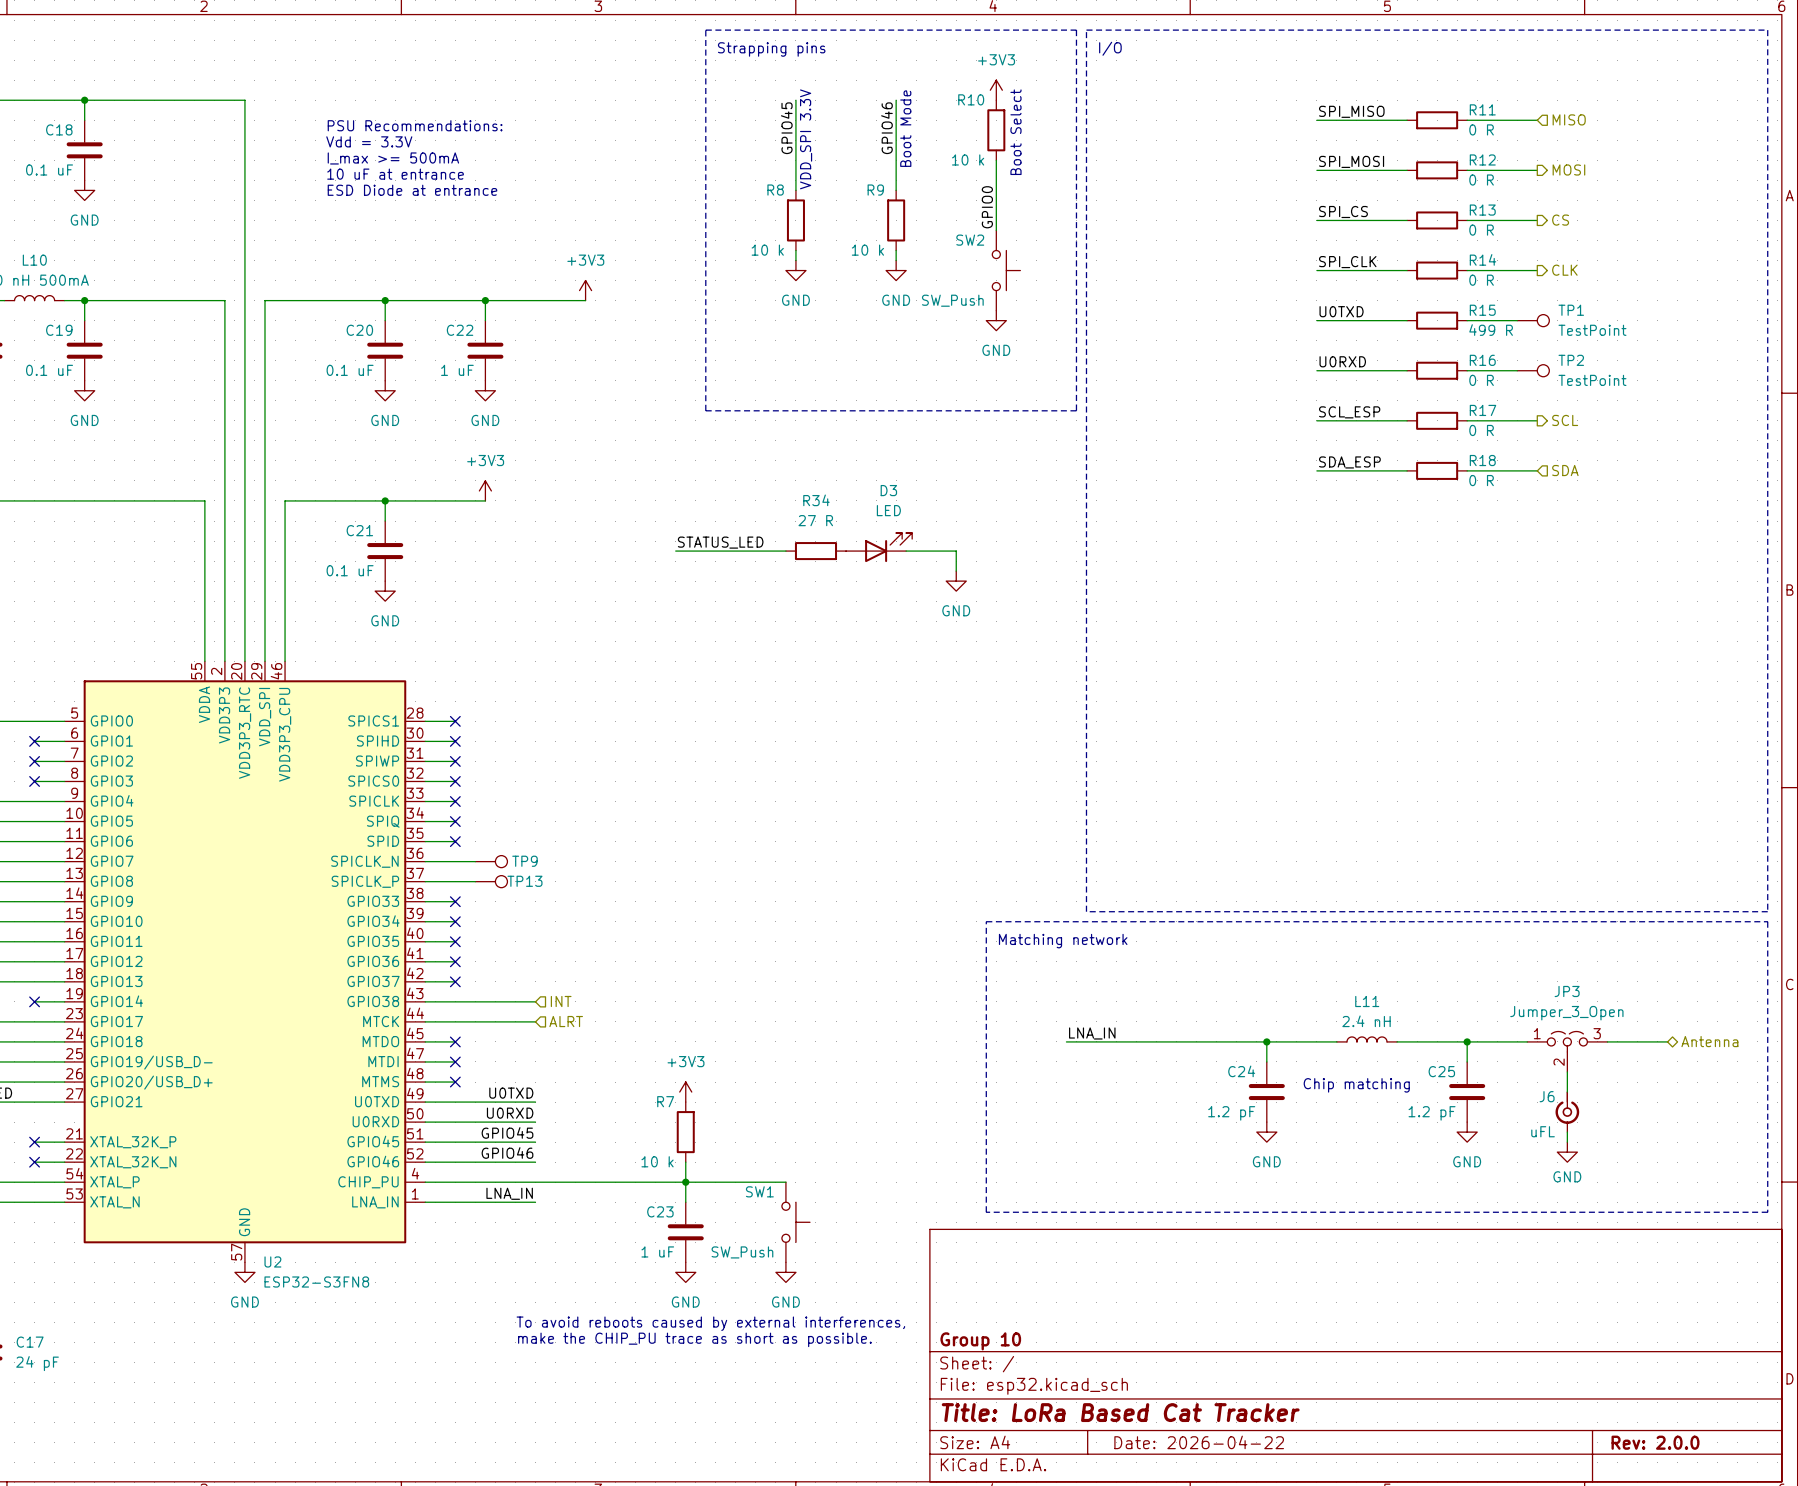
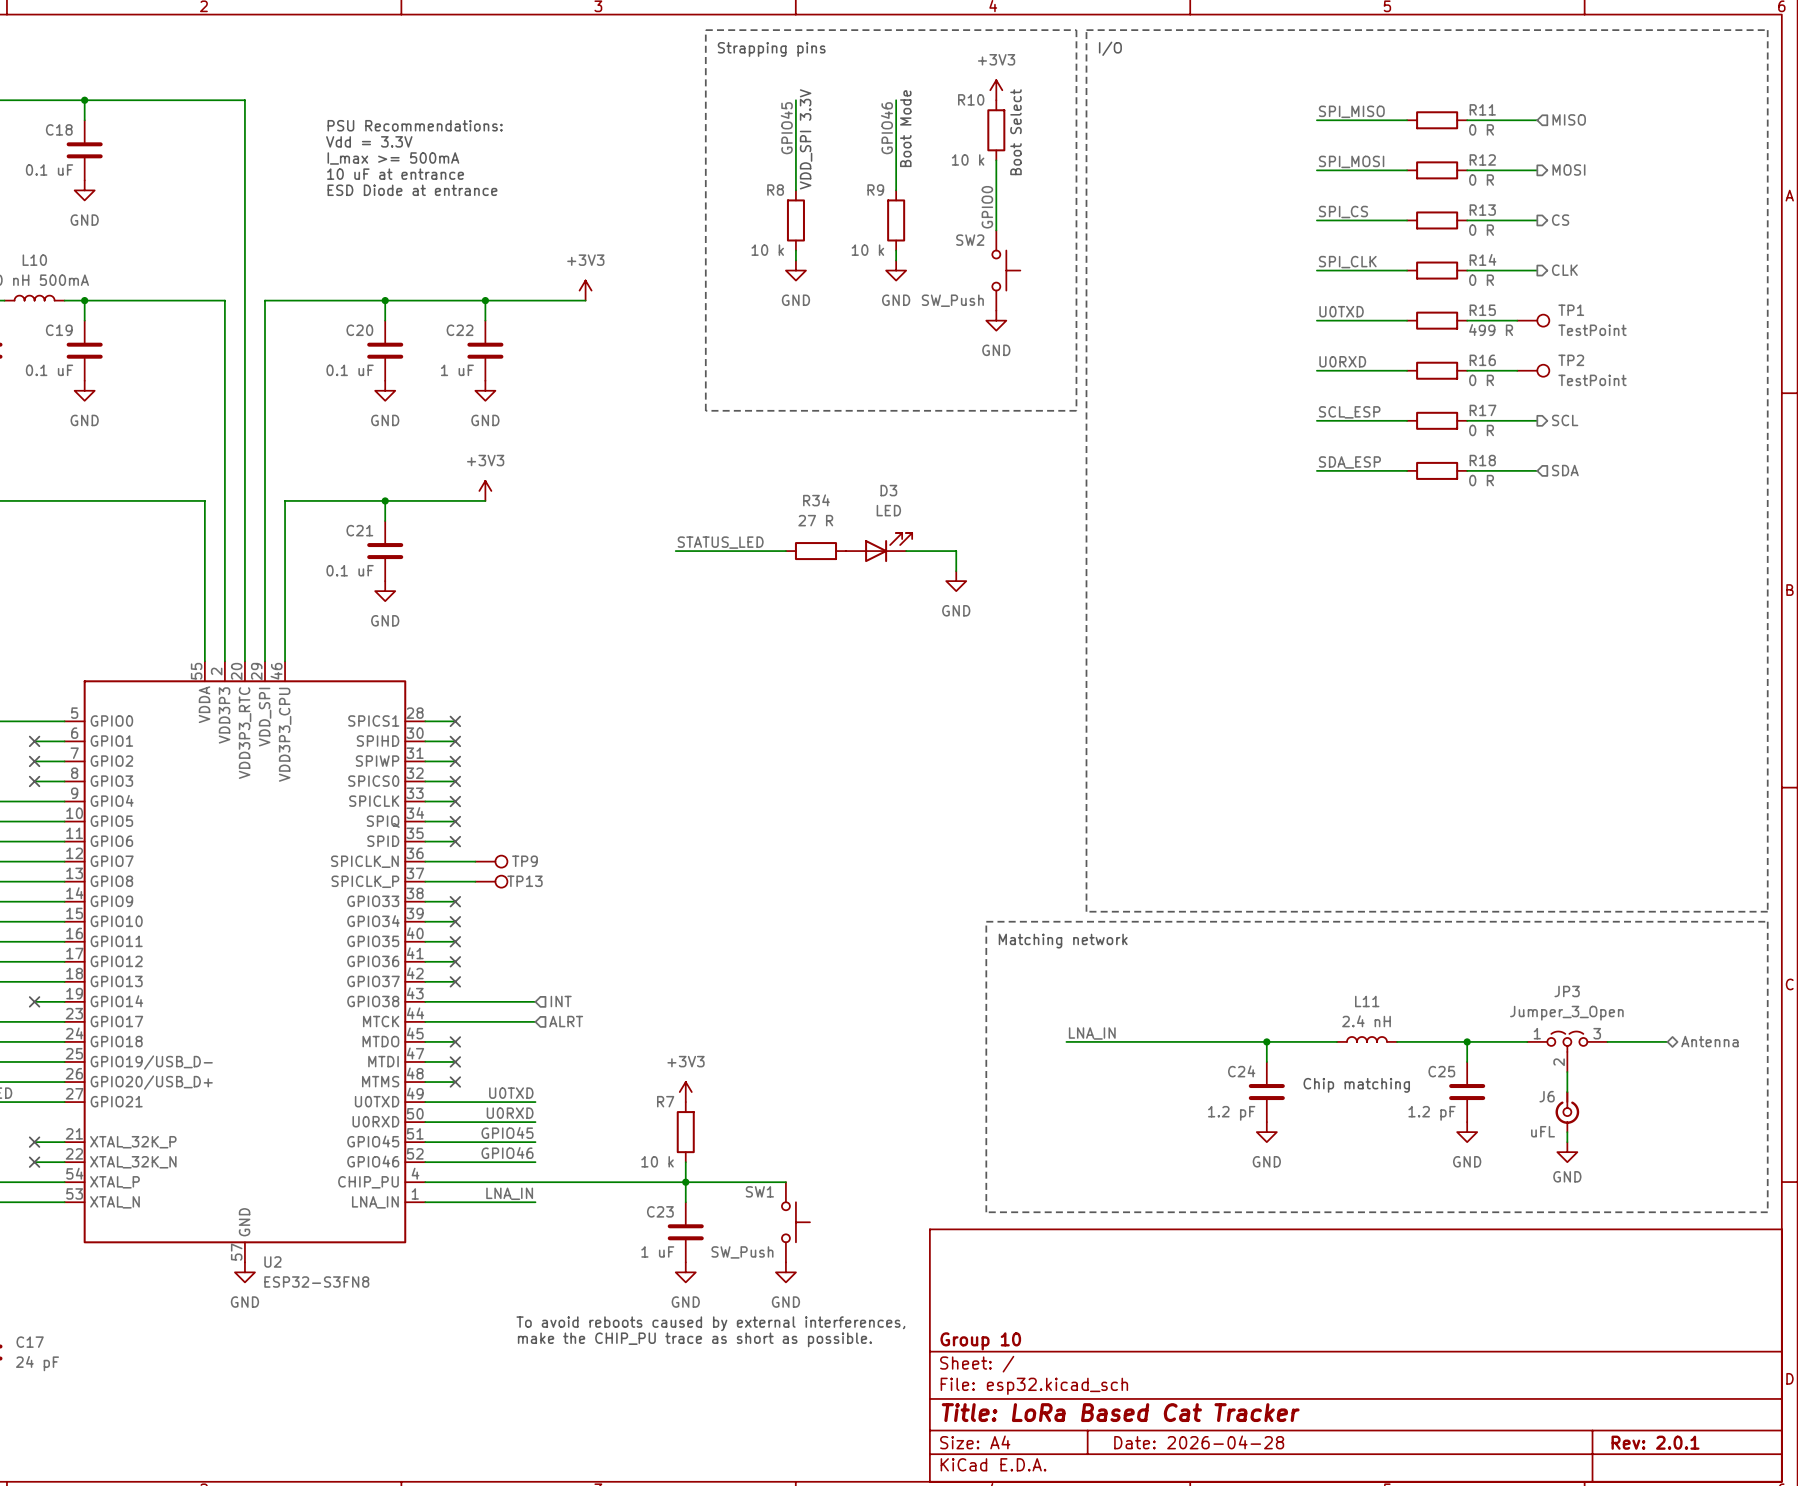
title block: Date: 2026-04-22 (1199, 1442) -> Date: 2026-04-28 (1199, 1442)
title block: Rev: 2.0.0 (1655, 1442) -> Rev: 2.0.1 (1655, 1442)

